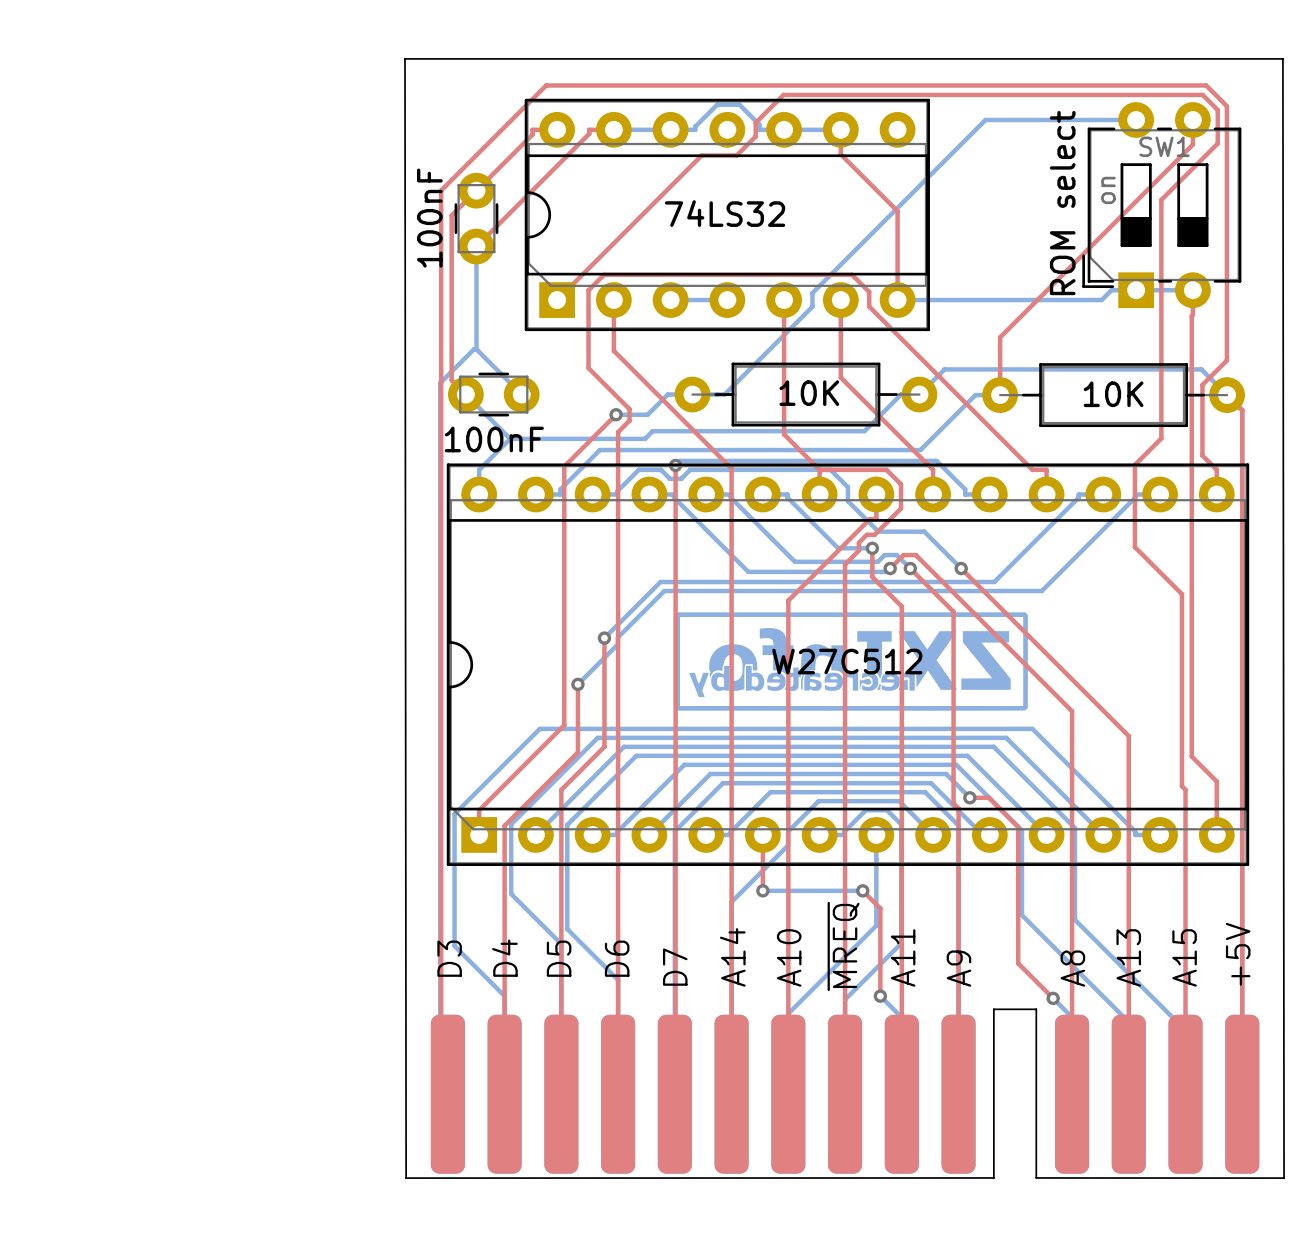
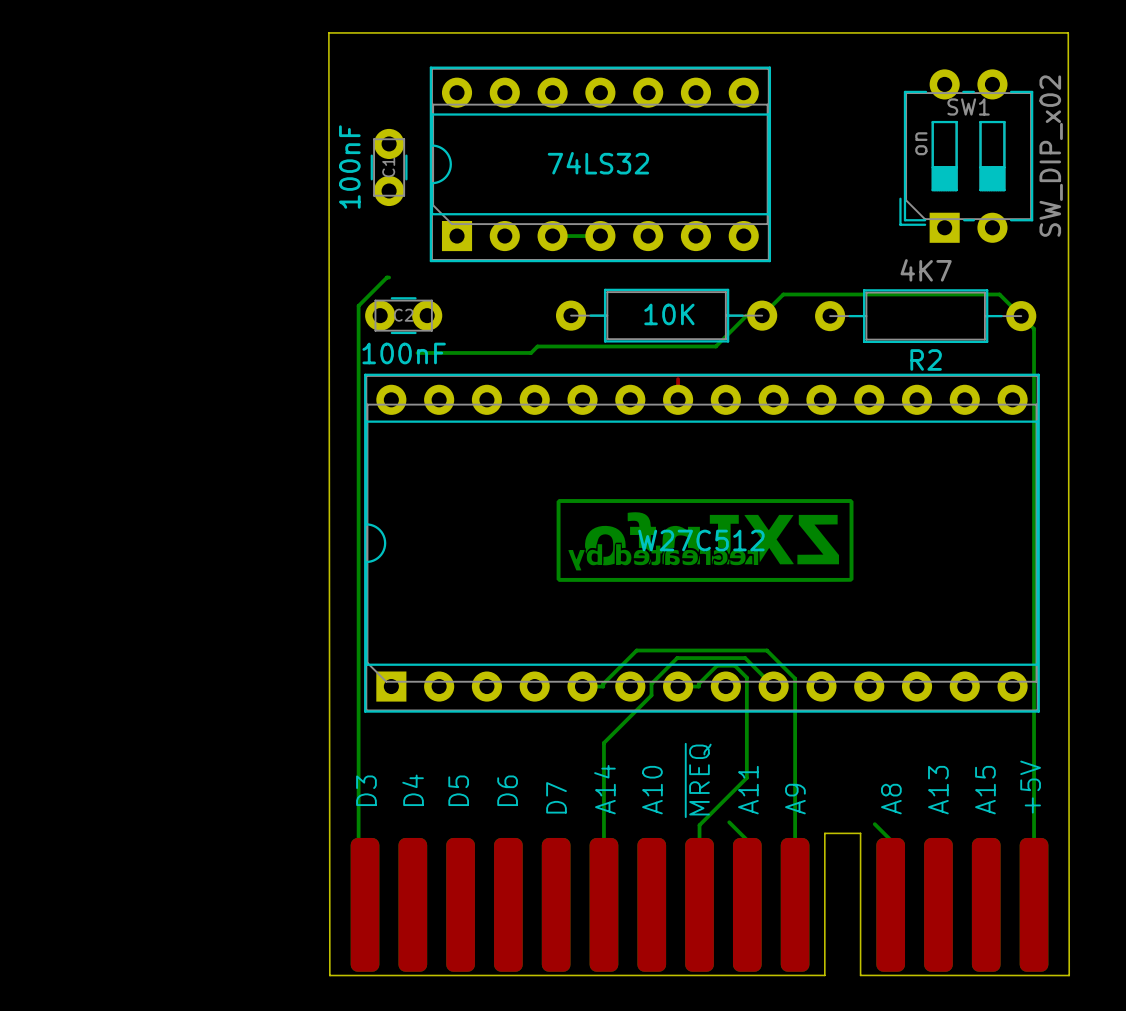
bottom track: (1136, 119) (985, 119) (812, 293) (812, 306) (724, 394) (667, 394) (647, 414) (616, 414) -> none
top track: (1192, 119) (1192, 144) (1000, 337) (1000, 395) -> none
top track: (557, 129) (532, 129) (532, 134) (451, 215) (451, 380) (465, 394) -> none
top track: (613, 129) (589, 129) (589, 133) (476, 246) -> none
bottom track: (613, 129) (695, 129) (695, 126) (717, 104) (739, 104) (759, 124) (759, 129) (840, 129) -> none
top track: (840, 129) (840, 154) (897, 211) (897, 300) -> none
SW1 value: ROM select (1062, 203) -> SW_DIP_x02 (1051, 156)
C1 name: none -> C1 (388, 167)
bottom track: (476, 246) (476, 349) (521, 394) -> none
top track: (1192, 290) (1191, 756) (1216, 781) (1216, 834) -> none
bottom track: (1192, 290) (1111, 290) (1101, 300) (897, 300) -> none
top track: (557, 300) (701, 155) (736, 155) (755, 136) (755, 122) (783, 94) (1202, 94) (1217, 110) (1217, 143) (1161, 199) (1161, 438) (1134, 464) (1134, 547) (1181, 594) (1181, 786) (1185, 789) (1185, 1094) -> none
top track: (613, 300) (613, 350) (731, 468) (731, 1094) -> none
top track: (784, 300) (784, 434) (819, 469) (886, 469) (901, 484) (901, 508) (874, 534) (866, 534) (858, 542) (858, 550) (845, 564) (845, 1094) -> none
top track: (840, 300) (840, 377) (933, 469) (933, 494) -> none
bottom track: (465, 394) (510, 438) (479, 469) (479, 494) -> none
C2 name: none -> C2 (403, 315)
R2 value: 10K (1113, 394) -> 4K7 (926, 270)
bottom track: (1000, 395) (975, 395) (920, 450) (599, 450) (560, 489) (560, 494) (535, 494) -> none
top track: (1227, 395) (1242, 410) (1242, 1094) -> none
top track: (616, 414) (564, 466) (564, 725) (479, 810) (479, 834) -> none
via: (616, 414) -> none
R2 name: none -> R2 (926, 359)
top track: (675, 465) (674, 1094) -> none
bottom track: (675, 465) (680, 460) (936, 460) (965, 489) (965, 494) (989, 494) -> none
via: (675, 465) -> none
bottom track: (592, 494) (617, 494) (617, 491) (638, 469) (661, 469) (670, 478) (681, 478) (690, 469) (830, 469) (847, 487) (847, 501) (878, 531) (924, 531) (961, 568) -> none
bottom track: (649, 494) (674, 494) (674, 497) (748, 571) (886, 571) (890, 568) -> none
bottom track: (706, 494) (730, 494) (730, 497) (794, 561) (877, 561) (884, 555) (896, 555) (910, 568) -> none
bottom track: (762, 494) (787, 494) (787, 497) (838, 548) (872, 548) -> none
top track: (876, 494) (876, 519) (869, 519) (788, 600) (788, 1094) -> none
top track: (1046, 494) (1046, 469) (1032, 469) (869, 306) (869, 292) (851, 274) (604, 274) (588, 290) (588, 368) (629, 409) (629, 420) (618, 432) (618, 1094) -> none
bottom track: (1103, 494) (1078, 494) (1078, 497) (994, 582) (660, 582) (604, 638) -> none
bottom track: (1160, 494) (1135, 494) (1135, 497) (1041, 591) (664, 591) (617, 637) (617, 644) (577, 684) -> none
top track: (1216, 494) (1216, 469) (1202, 455) (1202, 384) (1226, 360) (1226, 106) (1206, 85) (546, 85) (441, 190) (441, 1087) (447, 1094) -> none
top track: (872, 548) (872, 577) (901, 606) (901, 1094) -> none
via: (872, 548) -> none
top track: (890, 568) (903, 555) (915, 555) (1072, 711) (1072, 1094) -> none
via: (890, 568) -> none
top track: (910, 568) (953, 611) (953, 803) (958, 808) (958, 1094) -> none
via: (910, 568) -> none
top track: (961, 568) (1128, 736) (1128, 1094) -> none
via: (961, 568) -> none
top track: (604, 638) (604, 746) (561, 789) (561, 1094) -> none
via: (604, 638) -> none
top track: (577, 684) (577, 752) (504, 825) (504, 1094) -> none
via: (577, 684) -> none
top track: (969, 797) (988, 797) (1018, 827) (1018, 963) (1053, 998) -> none
bottom track: (969, 797) (946, 773) (710, 773) (649, 834) -> none
via: (969, 797) -> none
bottom track: (535, 834) (624, 746) (993, 746) (1074, 828) (1074, 919) (1185, 1030) (1185, 1094) -> none
bottom track: (592, 834) (617, 834) (617, 831) (684, 764) (956, 764) (1021, 830) (1021, 915) (1128, 1022) (1128, 1094) -> none
top track: (762, 834) (762, 890) -> none
bottom track: (876, 834) (876, 925) (788, 1013) (788, 1094) -> none
bottom track: (989, 834) (982, 834) (931, 783) (722, 783) (674, 831) (674, 1094) -> none
bottom track: (1046, 834) (967, 755) (636, 755) (567, 824) (567, 929) (618, 979) (618, 1094) -> none
bottom track: (1103, 834) (1006, 737) (597, 737) (511, 824) (511, 893) (561, 944) (561, 1094) -> none
bottom track: (1160, 834) (1135, 834) (1135, 831) (1032, 728) (539, 728) (454, 814) (454, 945) (504, 996) (504, 1094) -> none
bottom track: (762, 890) (862, 890) -> none
via: (762, 890) -> none
top track: (862, 890) (880, 908) (880, 996) -> none
via: (862, 890) -> none
via: (880, 996) -> none
via: (1053, 998) -> none

